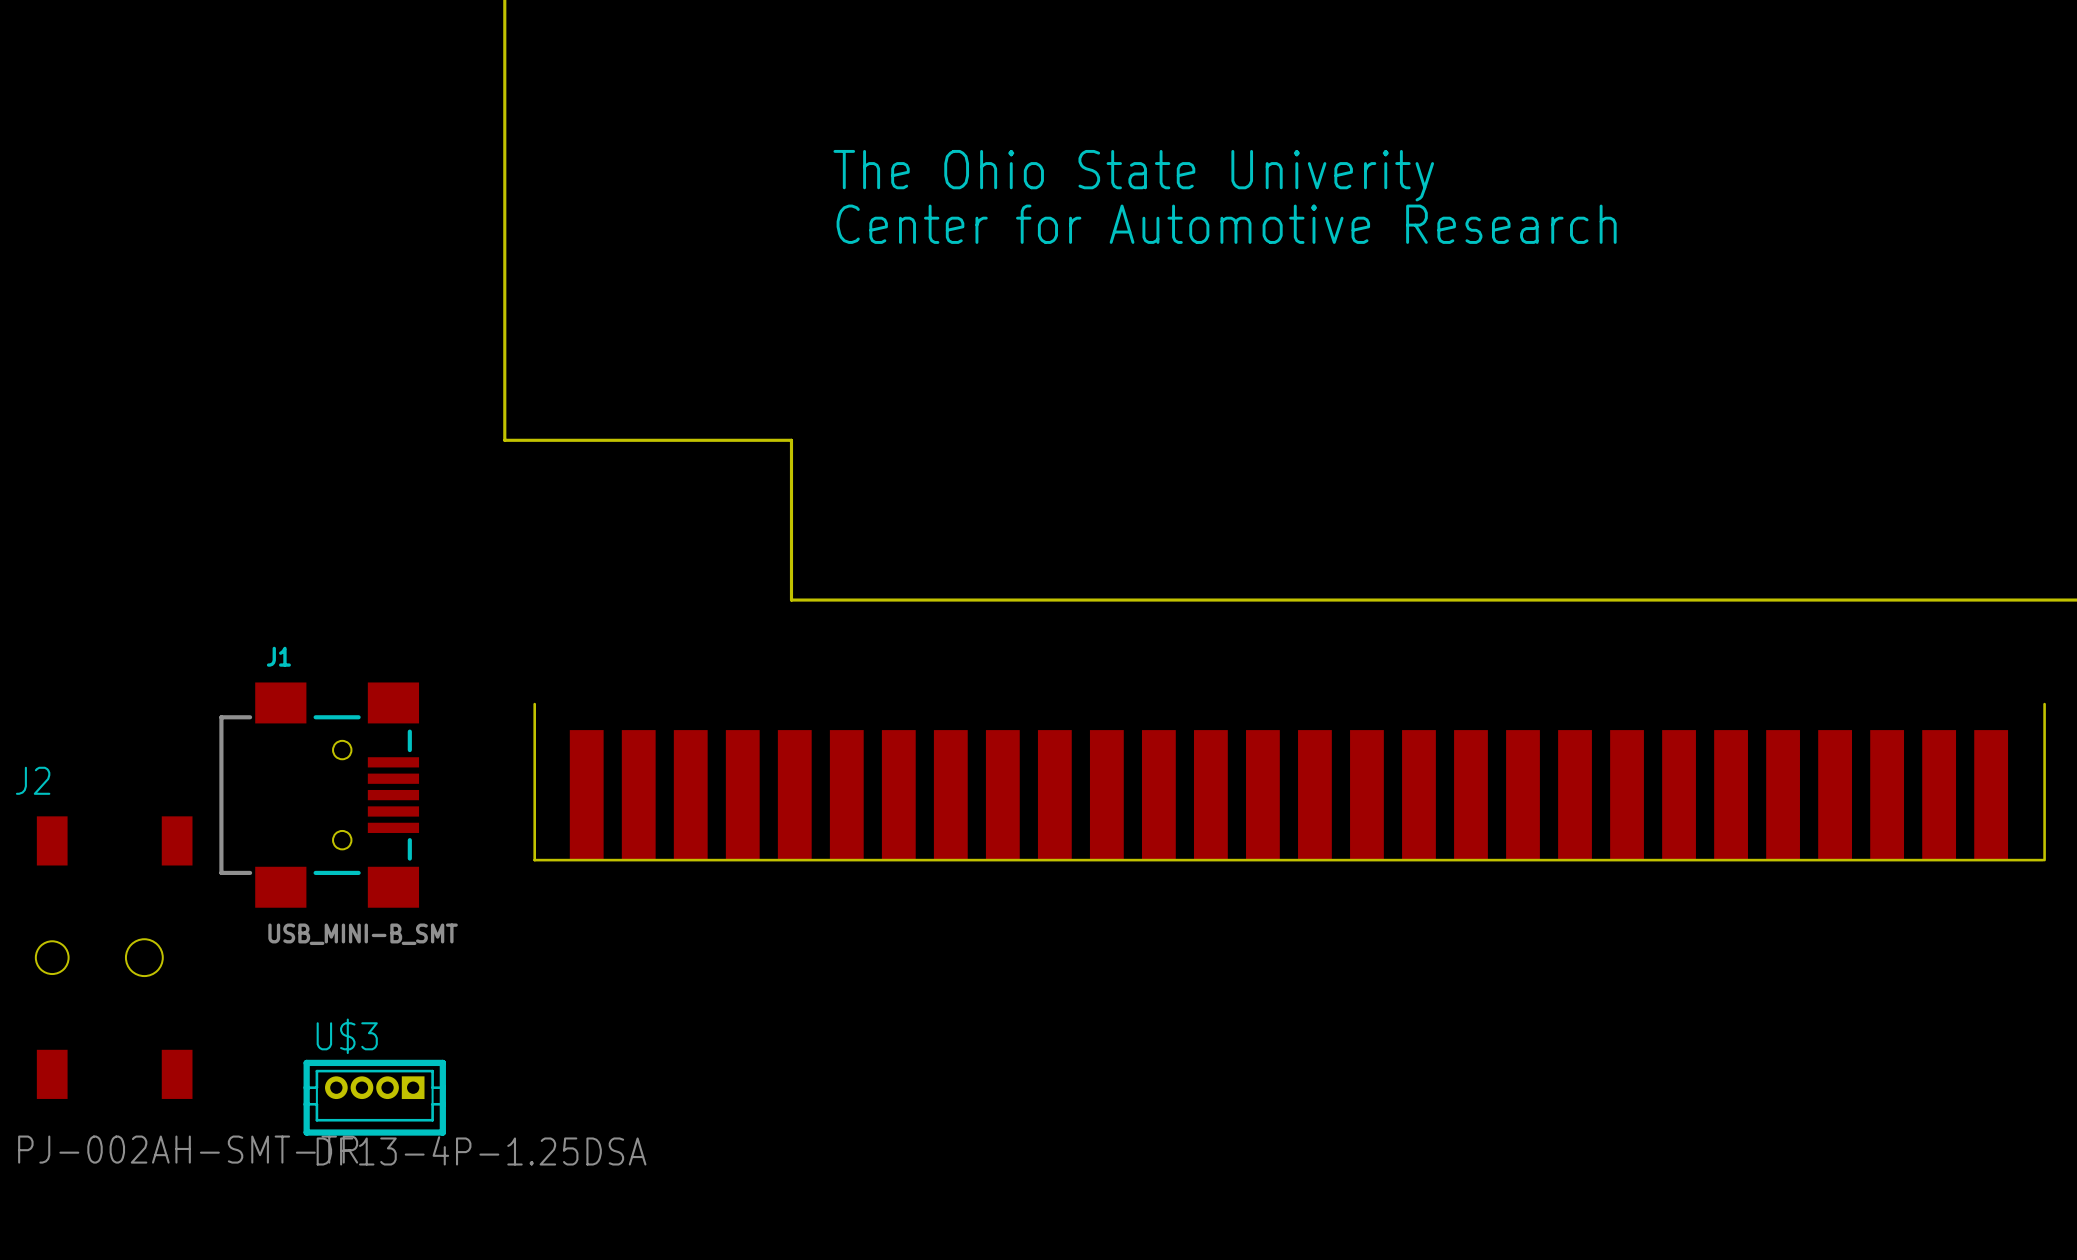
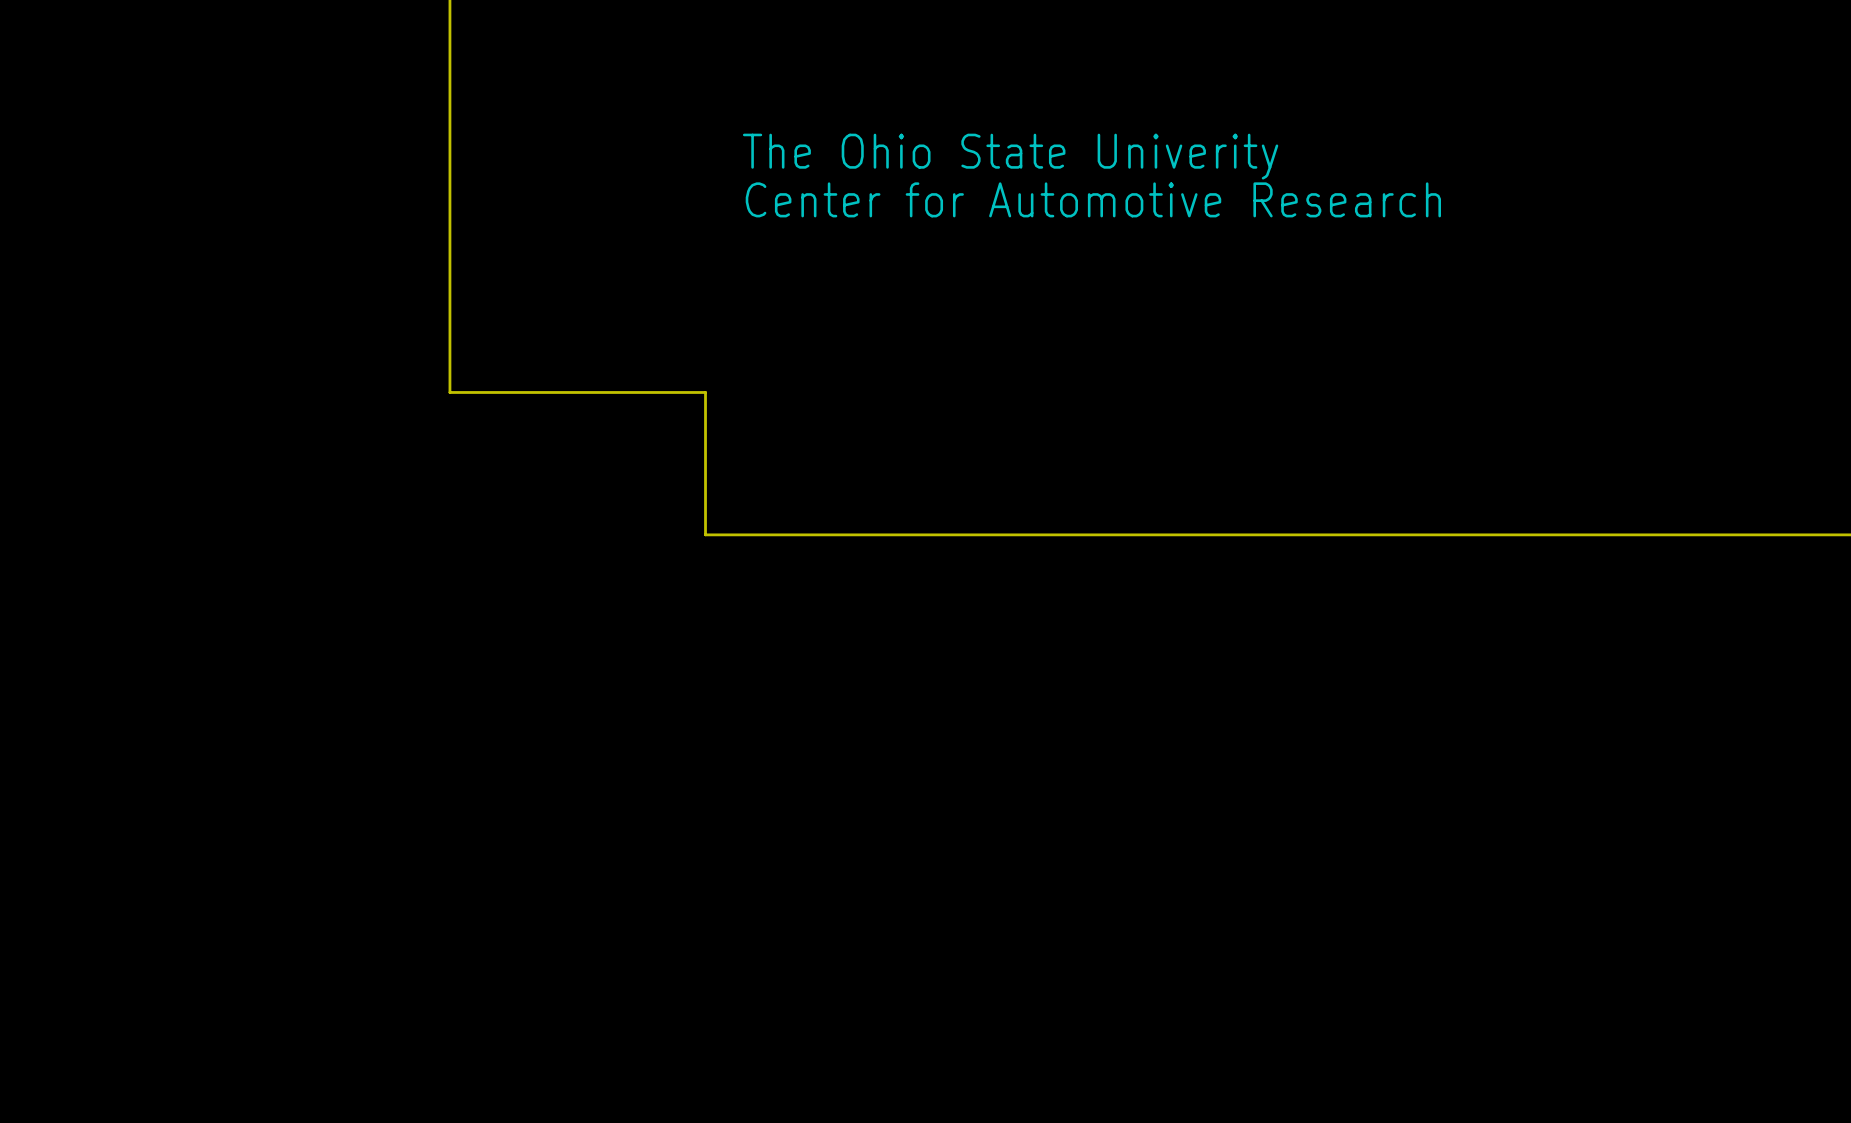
part: (1289, 782) -> none
J1: USB_MINI-B_SMT (319, 795) -> none
J2: PJ-002AH-SMT-TR (114, 957) -> none
U$3: DF13-4P-1.25DSA (374, 1097) -> none

